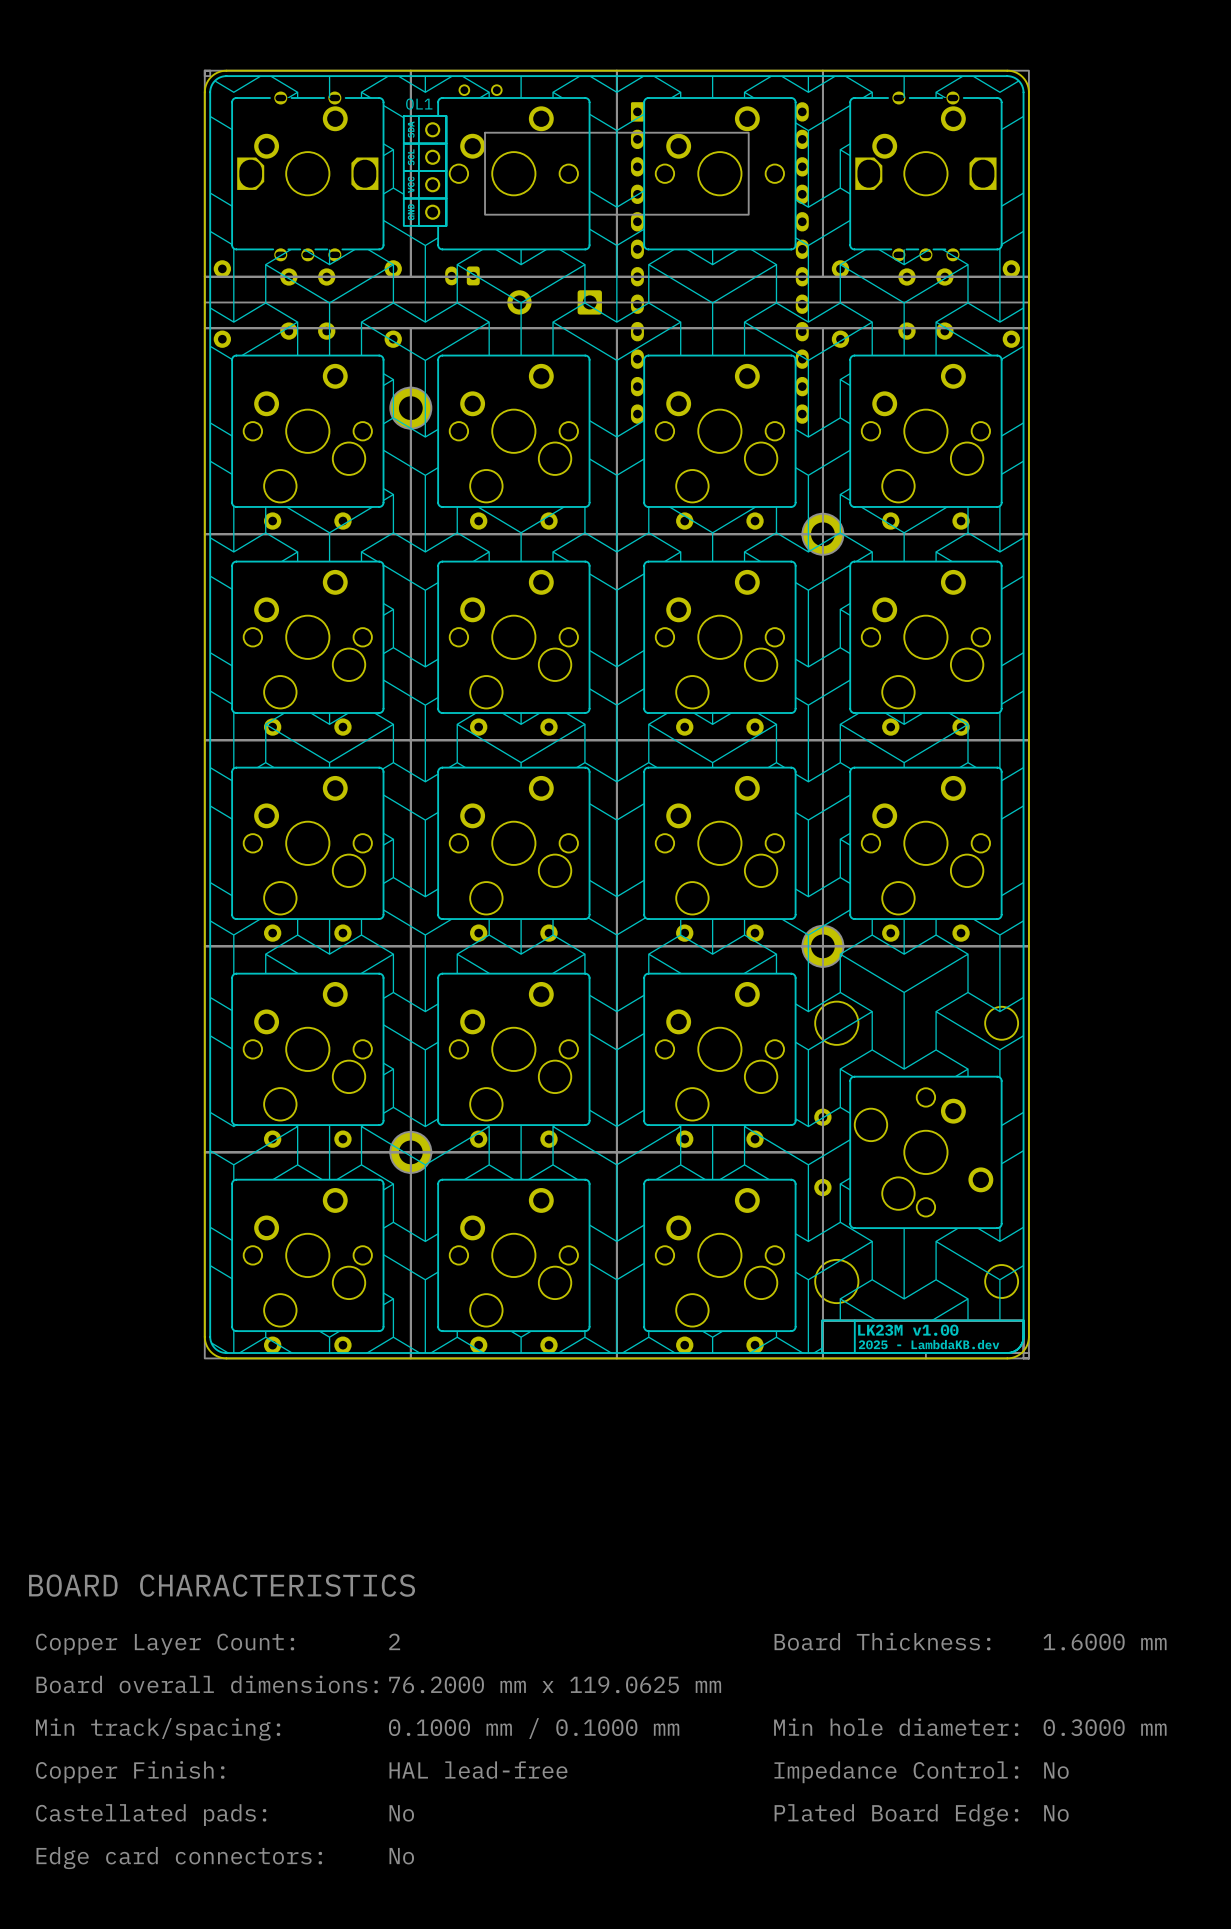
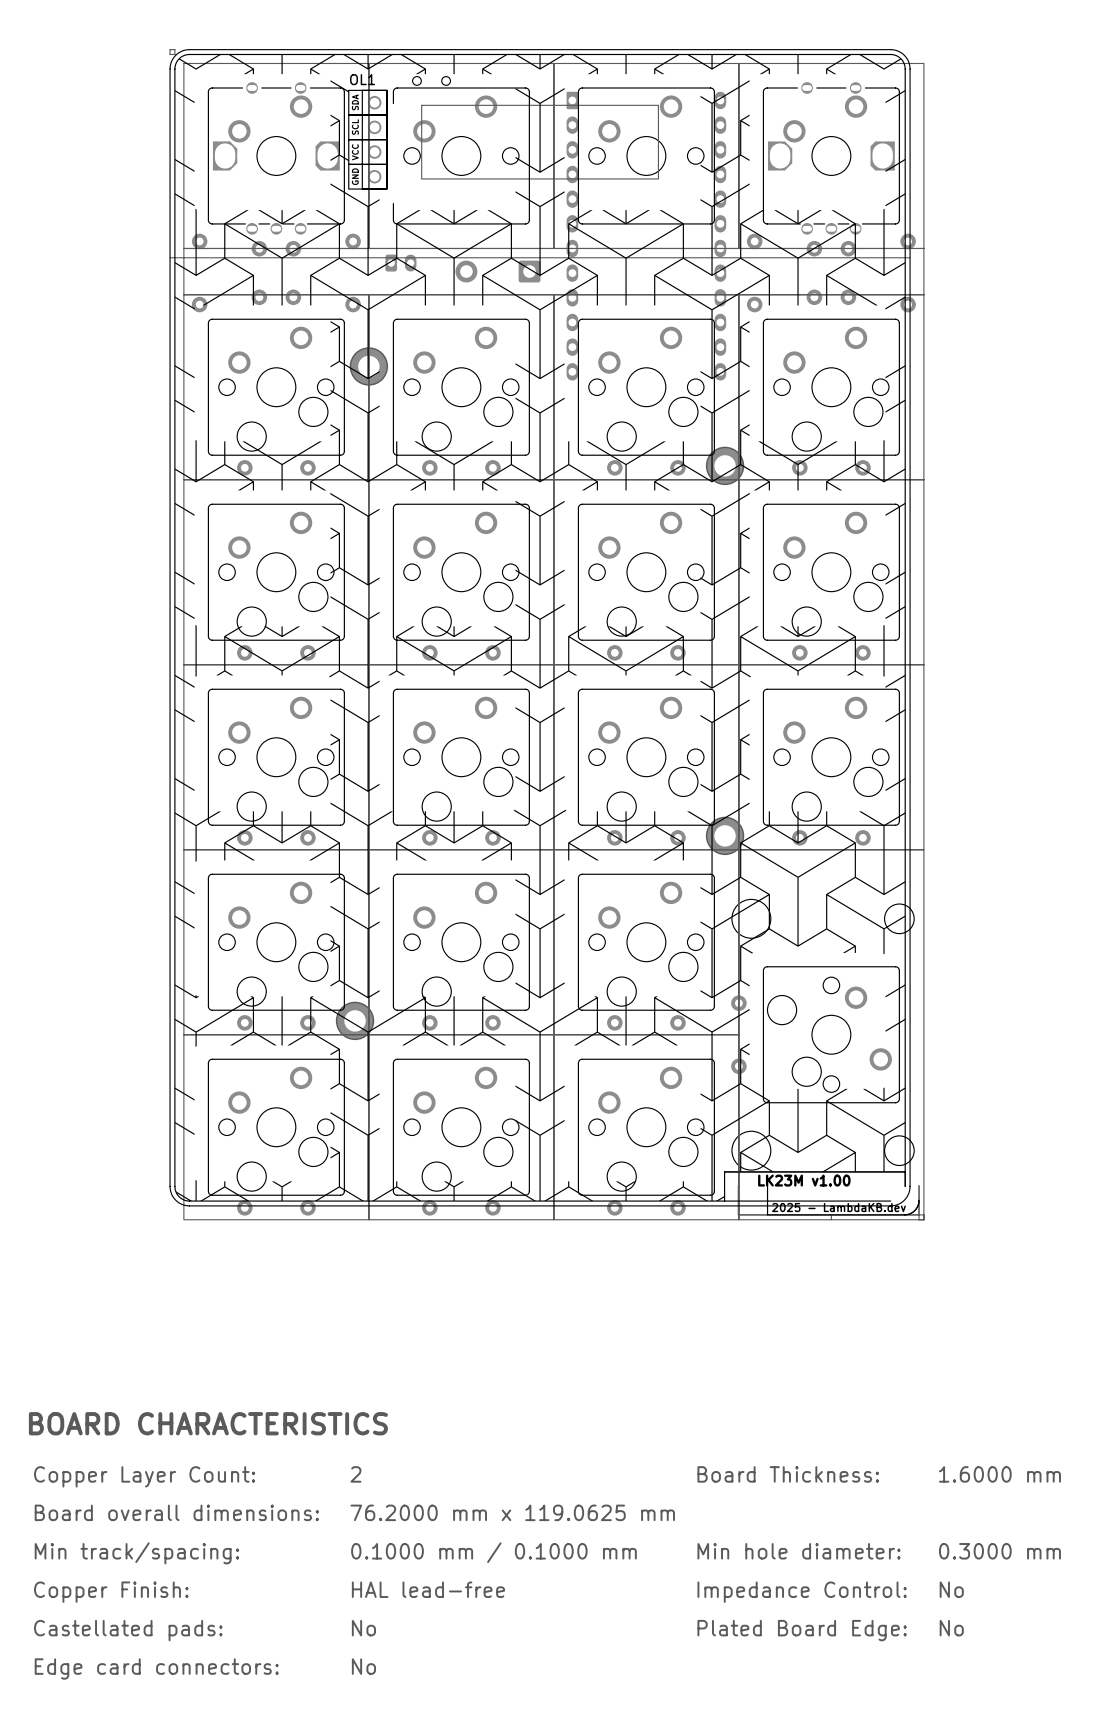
line: (204, 70) (204, 76) (210, 76) (210, 70) (204, 70) -> (170, 49) (170, 54) (174, 54) (174, 49) (170, 49)
board edge: (226, 70) (1007, 70) (1016, 72) (1025, 80) (1028, 92) (1028, 1336) (1026, 1346) (1018, 1355) (1007, 1358) (226, 1358) (214, 1355) (208, 1348) (204, 1336) (204, 92) (206, 85) (211, 77) (219, 71) (226, 70) -> (189, 49) (890, 49) (899, 51) (907, 58) (910, 69) (910, 1186) (907, 1196) (900, 1202) (890, 1205) (189, 1205) (181, 1203) (173, 1196) (170, 1186) (170, 69) (175, 55) (189, 49)
drawing position: (238, 84) -> (200, 62)
drawing position: (425, 84) -> (368, 62)
drawing position: (616, 84) -> (540, 62)
drawing position: (808, 84) -> (712, 62)
drawing position: (995, 84) -> (880, 62)
drawing position: (283, 87) -> (241, 64)
drawing position: (329, 87) -> (282, 64)
drawing position: (375, 87) -> (323, 64)
drawing position: (475, 87) -> (413, 64)
drawing position: (521, 87) -> (454, 64)
drawing position: (566, 87) -> (495, 64)
drawing position: (666, 87) -> (585, 64)
drawing position: (712, 87) -> (626, 64)
drawing position: (758, 87) -> (667, 64)
drawing position: (858, 87) -> (756, 64)
drawing position: (904, 87) -> (798, 64)
drawing position: (949, 87) -> (839, 64)
drawing position: (393, 111) -> (339, 86)
drawing position: (221, 122) -> (184, 96)
drawing position: (1012, 122) -> (895, 96)
drawing position: (822, 156) -> (725, 126)
drawing position: (616, 160) -> (540, 130)
drawing position: (393, 169) -> (339, 137)
OL1 position: (576, 171) -> (503, 139)
drawing position: (221, 199) -> (184, 165)
drawing position: (1012, 199) -> (895, 165)
drawing position: (221, 237) -> (184, 199)
drawing position: (1012, 237) -> (895, 199)
drawing position: (329, 257) -> (282, 217)
drawing position: (521, 257) -> (454, 217)
drawing position: (712, 257) -> (626, 217)
drawing position: (904, 257) -> (798, 217)
part rotation: 0° (462, 275) -> 180° (400, 263)
part position: (462, 275) -> (400, 263)
line: (204, 302) (1028, 302) -> (170, 257) (910, 257)
drawing position: (616, 328) -> (540, 281)
drawing position: (221, 352) -> (184, 302)
drawing position: (1012, 352) -> (895, 302)
drawing: none -> [174, 365, 195, 379]
drawing: none -> [885, 365, 906, 379]
drawing: [210, 422, 233, 437] -> none
drawing: [1001, 422, 1024, 437] -> none
drawing: none -> [885, 399, 906, 413]
drawing: none -> [174, 399, 195, 413]
drawing: [210, 460, 233, 476] -> none
drawing: [1001, 460, 1024, 476] -> none
drawing position: (425, 505) -> (368, 440)
drawing position: (808, 505) -> (712, 440)
drawing position: (616, 509) -> (540, 443)
drawing position: (254, 533) -> (214, 465)
drawing position: (979, 533) -> (865, 465)
drawing position: (329, 534) -> (282, 465)
drawing position: (521, 534) -> (454, 465)
drawing position: (712, 534) -> (626, 465)
part position: (822, 534) -> (725, 465)
drawing position: (904, 534) -> (798, 465)
drawing position: (221, 582) -> (184, 509)
drawing position: (1012, 582) -> (895, 509)
drawing position: (410, 615) -> (354, 539)
drawing position: (823, 615) -> (725, 539)
drawing position: (616, 620) -> (540, 543)
drawing: none -> [174, 571, 195, 585]
drawing: none -> [885, 571, 906, 585]
drawing: [210, 651, 233, 667] -> none
drawing: [1001, 651, 1024, 667] -> none
drawing: none -> [174, 605, 195, 620]
drawing: none -> [885, 605, 906, 620]
drawing: [210, 690, 233, 705] -> none
drawing: [1001, 690, 1024, 705] -> none
drawing position: (329, 719) -> (282, 631)
drawing position: (521, 719) -> (454, 631)
drawing position: (712, 719) -> (626, 631)
drawing position: (904, 719) -> (798, 631)
drawing position: (347, 730) -> (297, 642)
drawing position: (886, 730) -> (782, 642)
drawing position: (616, 735) -> (540, 646)
drawing position: (233, 740) -> (196, 650)
drawing position: (999, 740) -> (884, 650)
drawing: none -> [174, 674, 195, 688]
drawing: none -> [885, 674, 906, 688]
drawing: [210, 766, 233, 782] -> none
drawing: [1001, 766, 1024, 782] -> none
drawing: none -> [174, 709, 195, 723]
drawing: none -> [885, 709, 906, 723]
drawing: [210, 805, 233, 820] -> none
drawing: [1001, 805, 1024, 820] -> none
drawing position: (410, 845) -> (355, 745)
drawing position: (822, 845) -> (725, 745)
drawing position: (616, 850) -> (540, 749)
drawing position: (221, 889) -> (184, 784)
drawing position: (1012, 889) -> (895, 784)
drawing position: (521, 946) -> (454, 835)
drawing position: (712, 946) -> (626, 835)
part position: (822, 946) -> (725, 835)
drawing position: (235, 947) -> (198, 836)
drawing position: (359, 960) -> (308, 848)
drawing position: (616, 964) -> (540, 852)
drawing: none -> [174, 881, 195, 895]
drawing: [210, 996, 233, 1012] -> none
drawing position: (902, 1018) -> (796, 900)
drawing: none -> [174, 915, 195, 929]
drawing: [210, 1035, 233, 1050] -> none
drawing position: (410, 1075) -> (355, 952)
drawing position: (616, 1080) -> (540, 955)
drawing: none -> [885, 984, 906, 998]
drawing: [1001, 1111, 1024, 1127] -> none
drawing position: (223, 1119) -> (187, 991)
drawing: none -> [885, 1018, 906, 1032]
drawing: [1001, 1149, 1024, 1165] -> none
drawing position: (329, 1152) -> (282, 1020)
part position: (410, 1152) -> (355, 1020)
drawing position: (521, 1152) -> (454, 1020)
drawing position: (712, 1152) -> (626, 1020)
drawing position: (266, 1153) -> (225, 1021)
drawing position: (425, 1183) -> (368, 1048)
drawing position: (616, 1183) -> (540, 1048)
drawing: none -> [174, 1087, 195, 1101]
drawing: [210, 1226, 233, 1242] -> none
drawing position: (999, 1234) -> (884, 1094)
drawing position: (871, 1239) -> (768, 1098)
drawing: none -> [174, 1121, 195, 1136]
drawing: [210, 1264, 233, 1280] -> none
drawing position: (410, 1303) -> (355, 1156)
drawing position: (616, 1307) -> (540, 1160)
line: (822, 1320) (1023, 1320) (822, 1320) -> (724, 1171) (905, 1171) (724, 1171)
drawing position: (393, 1322) -> (339, 1173)
text position: LK23M v1.00 (908, 1330) -> LK23M v1.00 (804, 1180)
drawing position: (233, 1341) -> (196, 1190)
drawing position: (584, 1341) -> (511, 1191)
drawing position: (648, 1341) -> (568, 1191)
drawing position: (265, 1342) -> (224, 1191)
drawing position: (329, 1342) -> (282, 1191)
drawing position: (457, 1342) -> (396, 1191)
drawing position: (521, 1342) -> (454, 1191)
drawing position: (712, 1342) -> (626, 1191)
drawing position: (776, 1342) -> (683, 1191)
drawing position: (220, 1347) -> (184, 1196)
drawing position: (817, 1350) -> (720, 1198)
line: (822, 1353) (822, 1320) (1023, 1320) (1023, 1336) (1023, 92) (1022, 86) (1015, 78) (1007, 76) (220, 77) (212, 84) (210, 92) (210, 1336) (212, 1344) (218, 1350) (226, 1353) (1007, 1353) -> (724, 1201) (724, 1171) (905, 1171) (905, 1186) (905, 69) (904, 63) (899, 57) (890, 54) (183, 55) (176, 61) (174, 69) (174, 1186) (176, 1193) (182, 1199) (189, 1201) (890, 1201)

